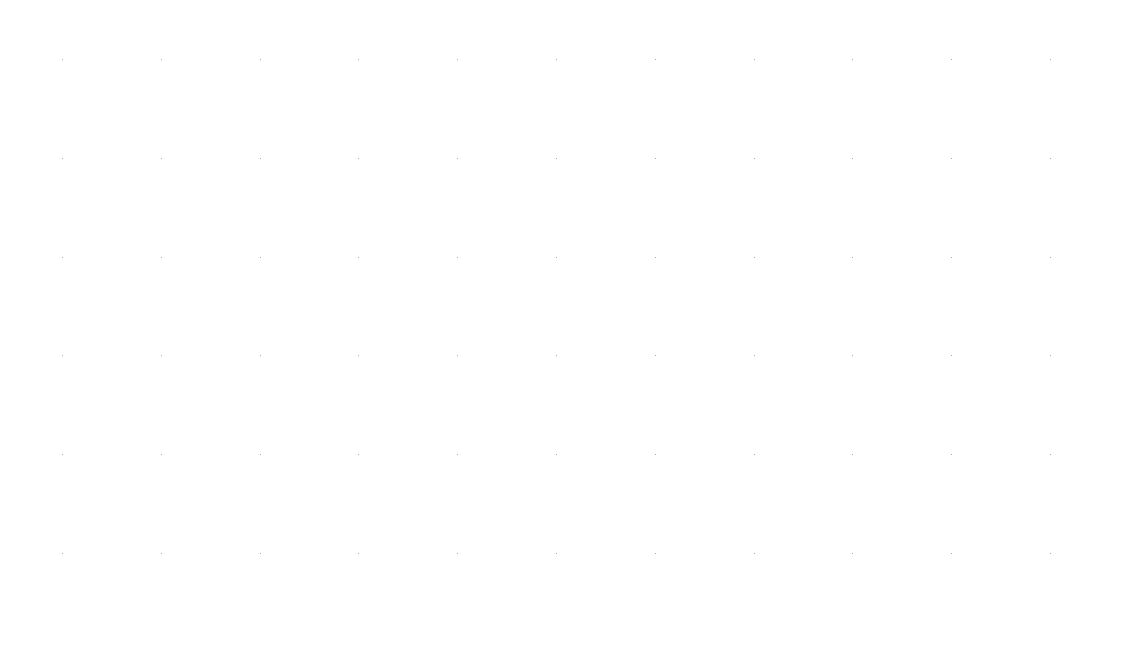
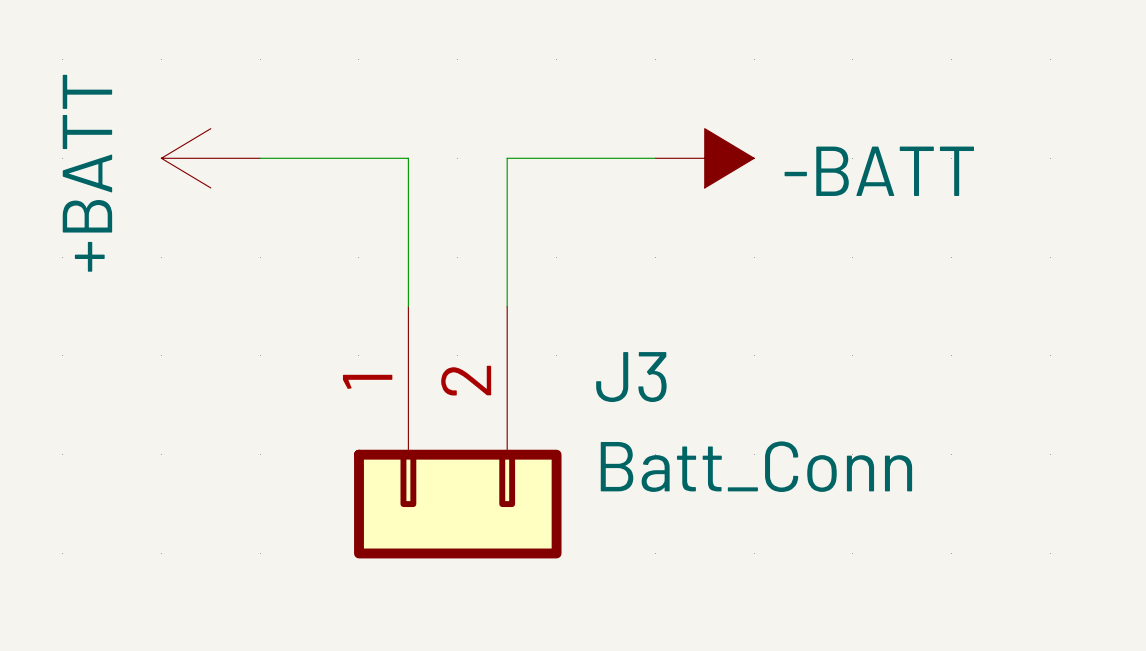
power symbol: none -> +BATT (210, 158)
wire: none -> (260, 158) (408, 158) (408, 306)
wire: none -> (655, 158) (507, 158) (507, 306)
power symbol: none -> -BATT (704, 158)
J3: none -> Batt_Conn (457, 432)

